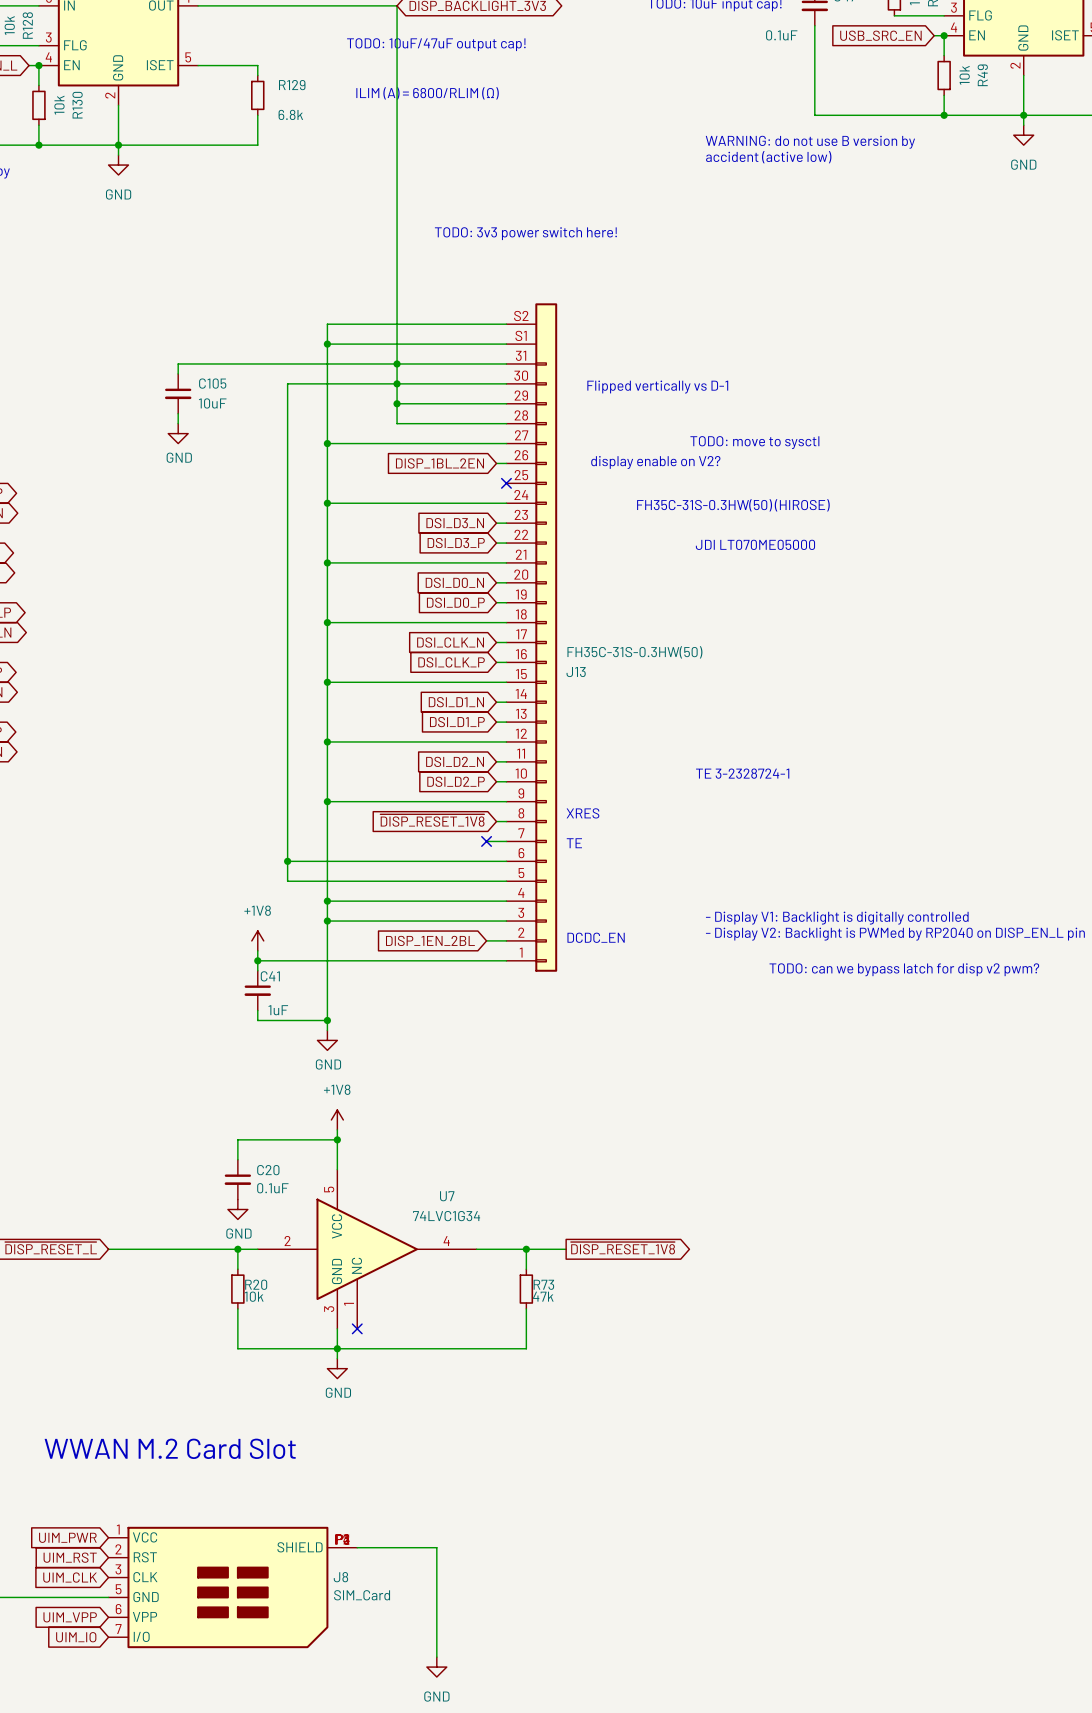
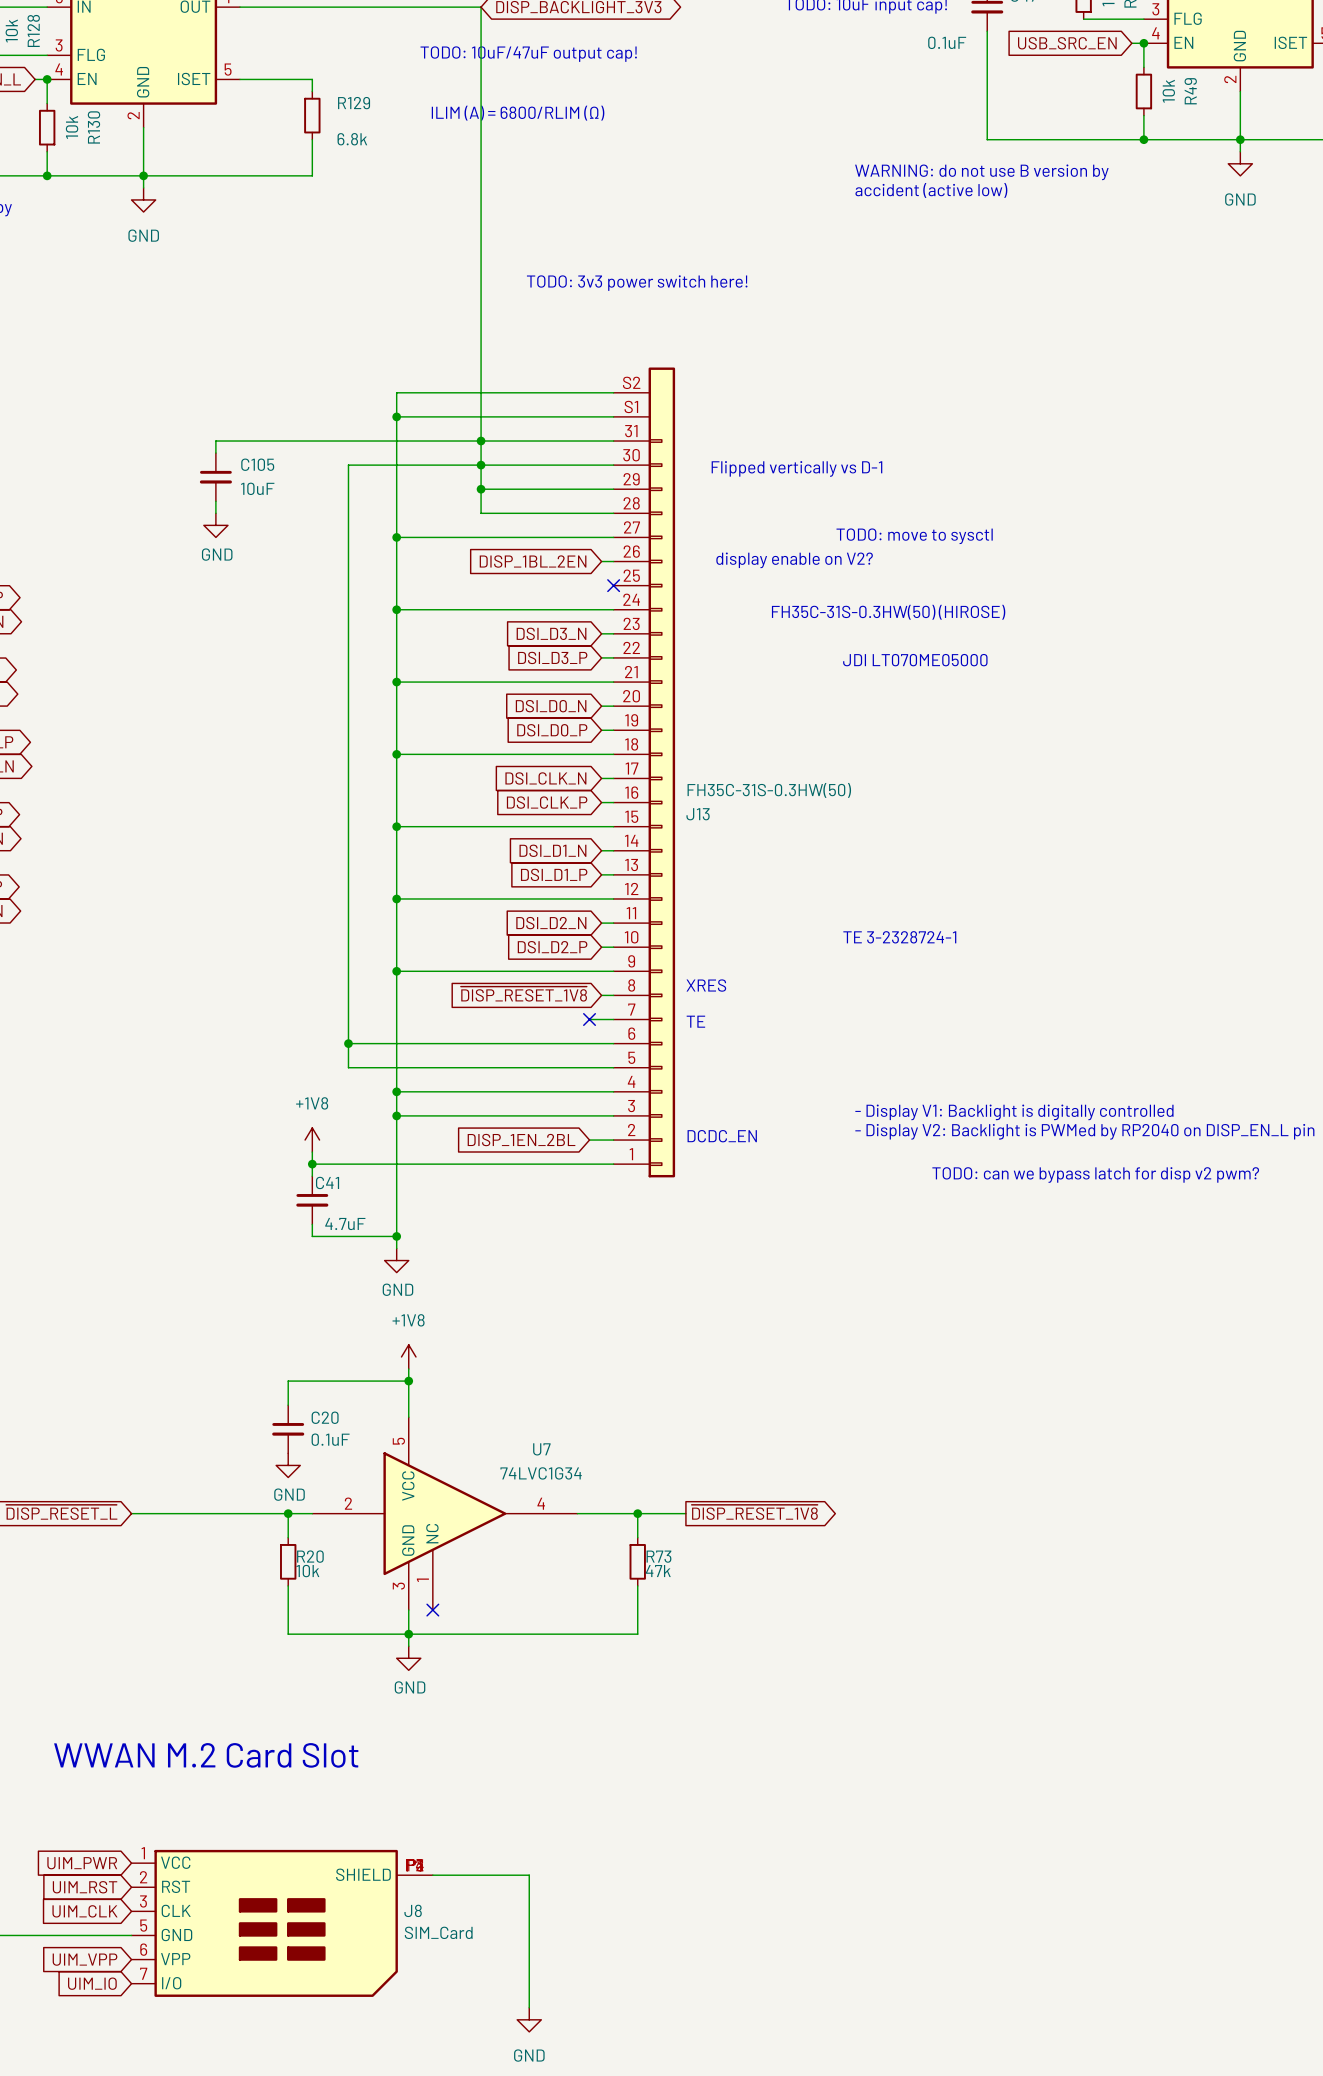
C41 value: 1uF (278, 1010) -> 4.7uF (345, 1224)

